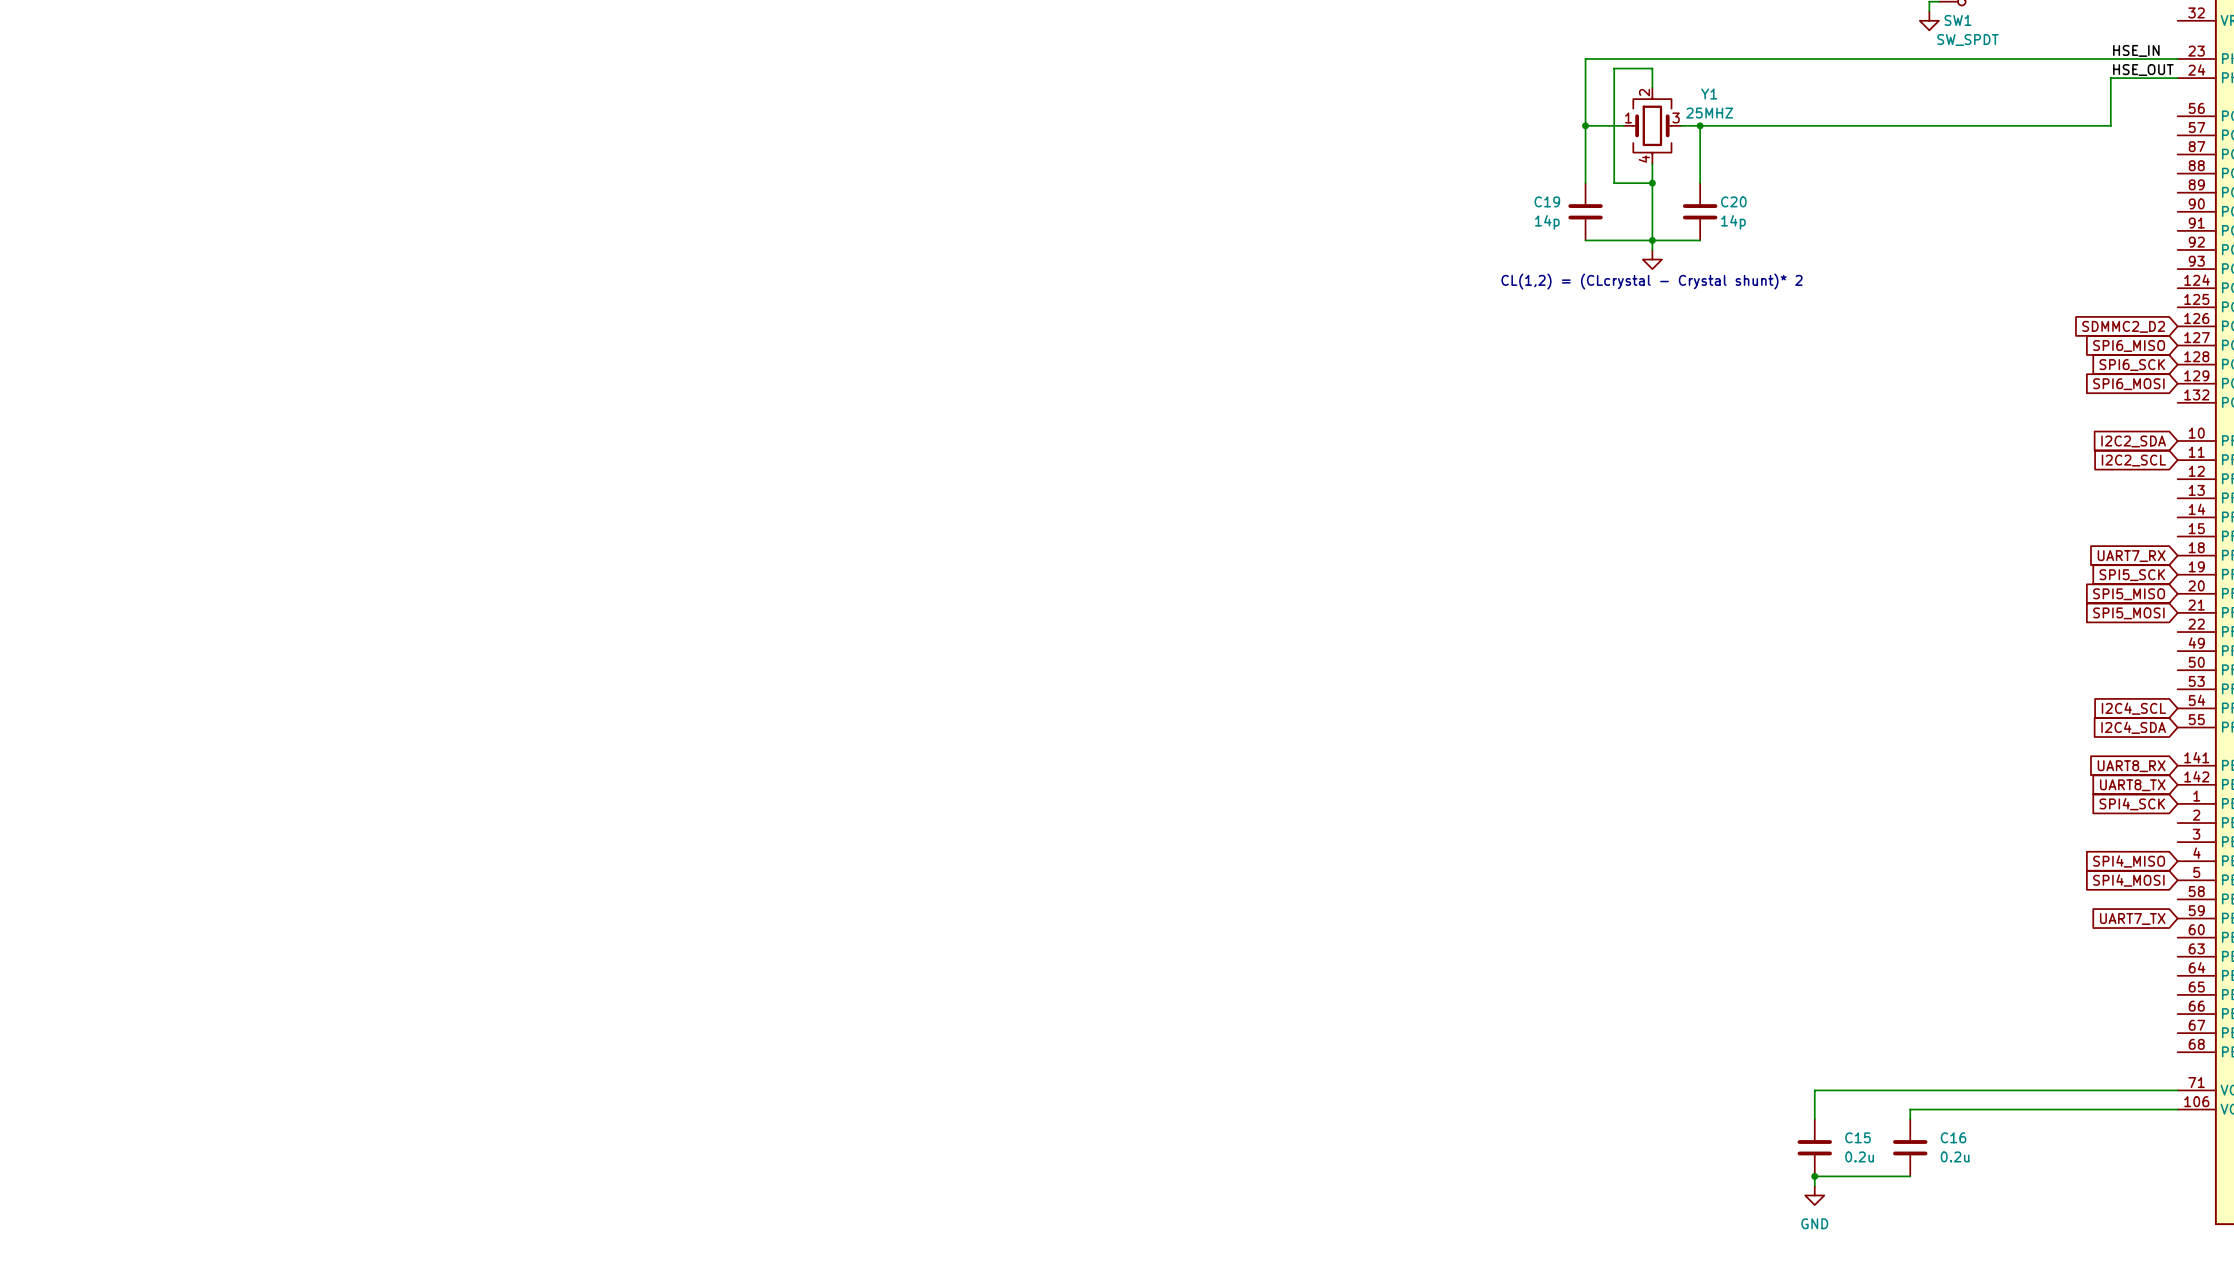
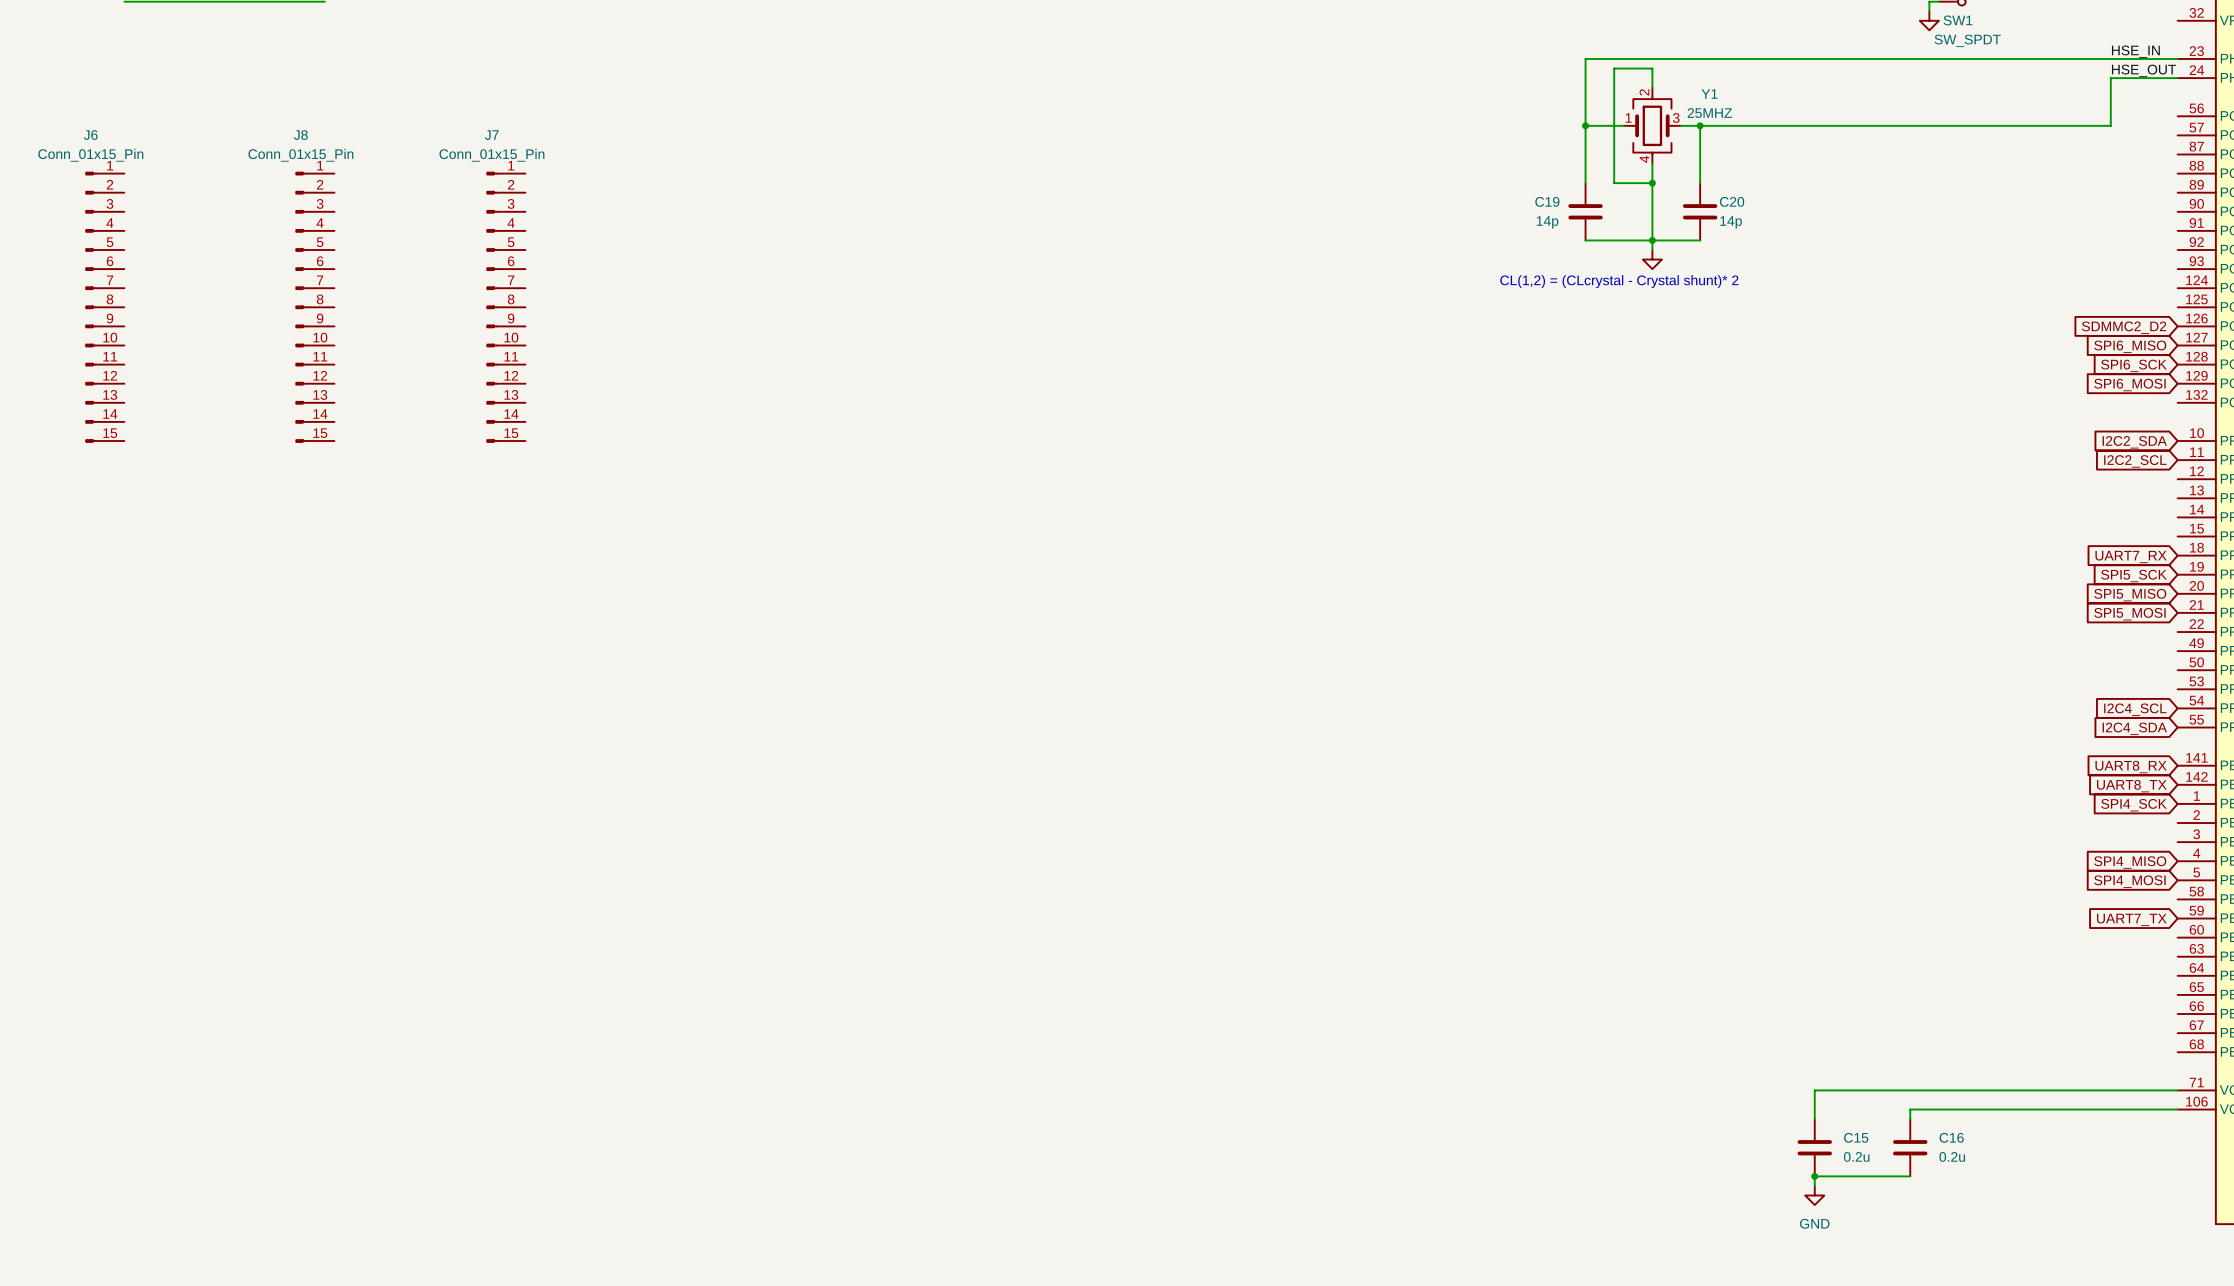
wire: none -> (124, 1) (324, 1)
J6: none -> Conn_01x15_Pin (104, 307)
J8: none -> Conn_01x15_Pin (315, 307)
J7: none -> Conn_01x15_Pin (506, 307)

